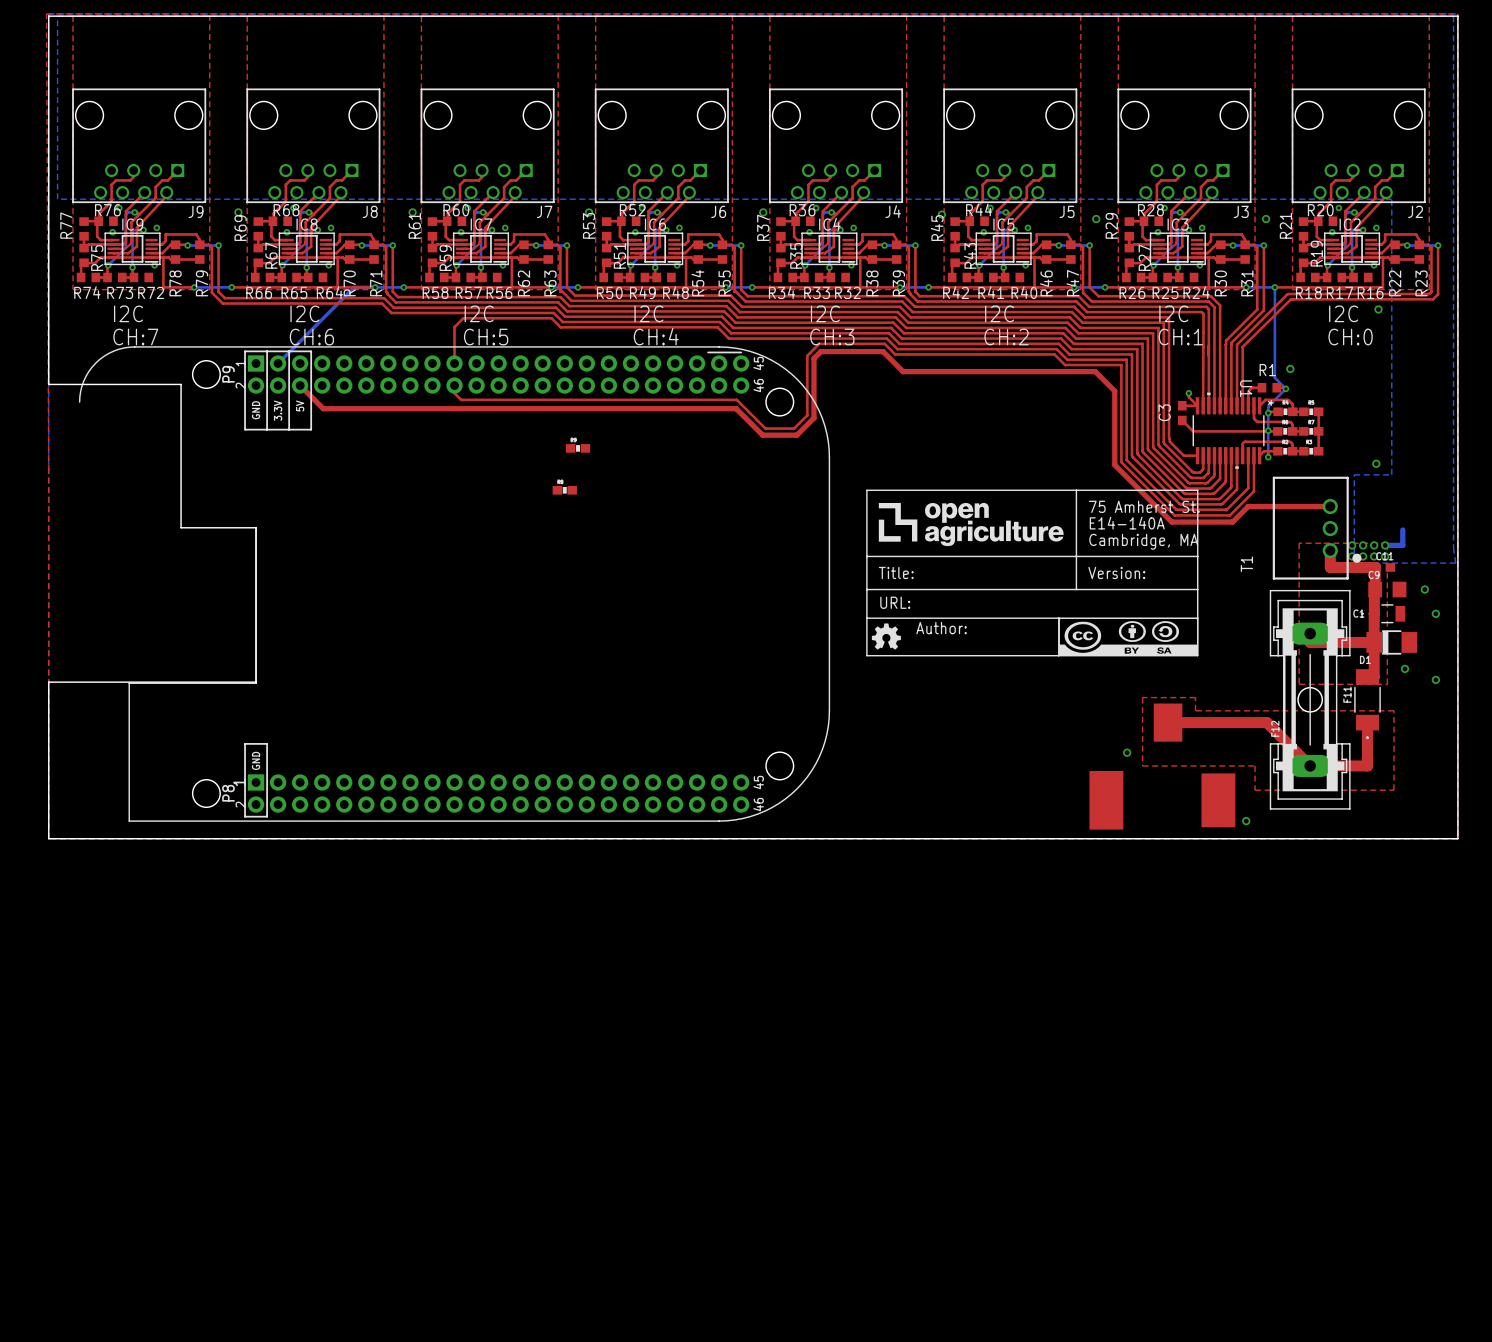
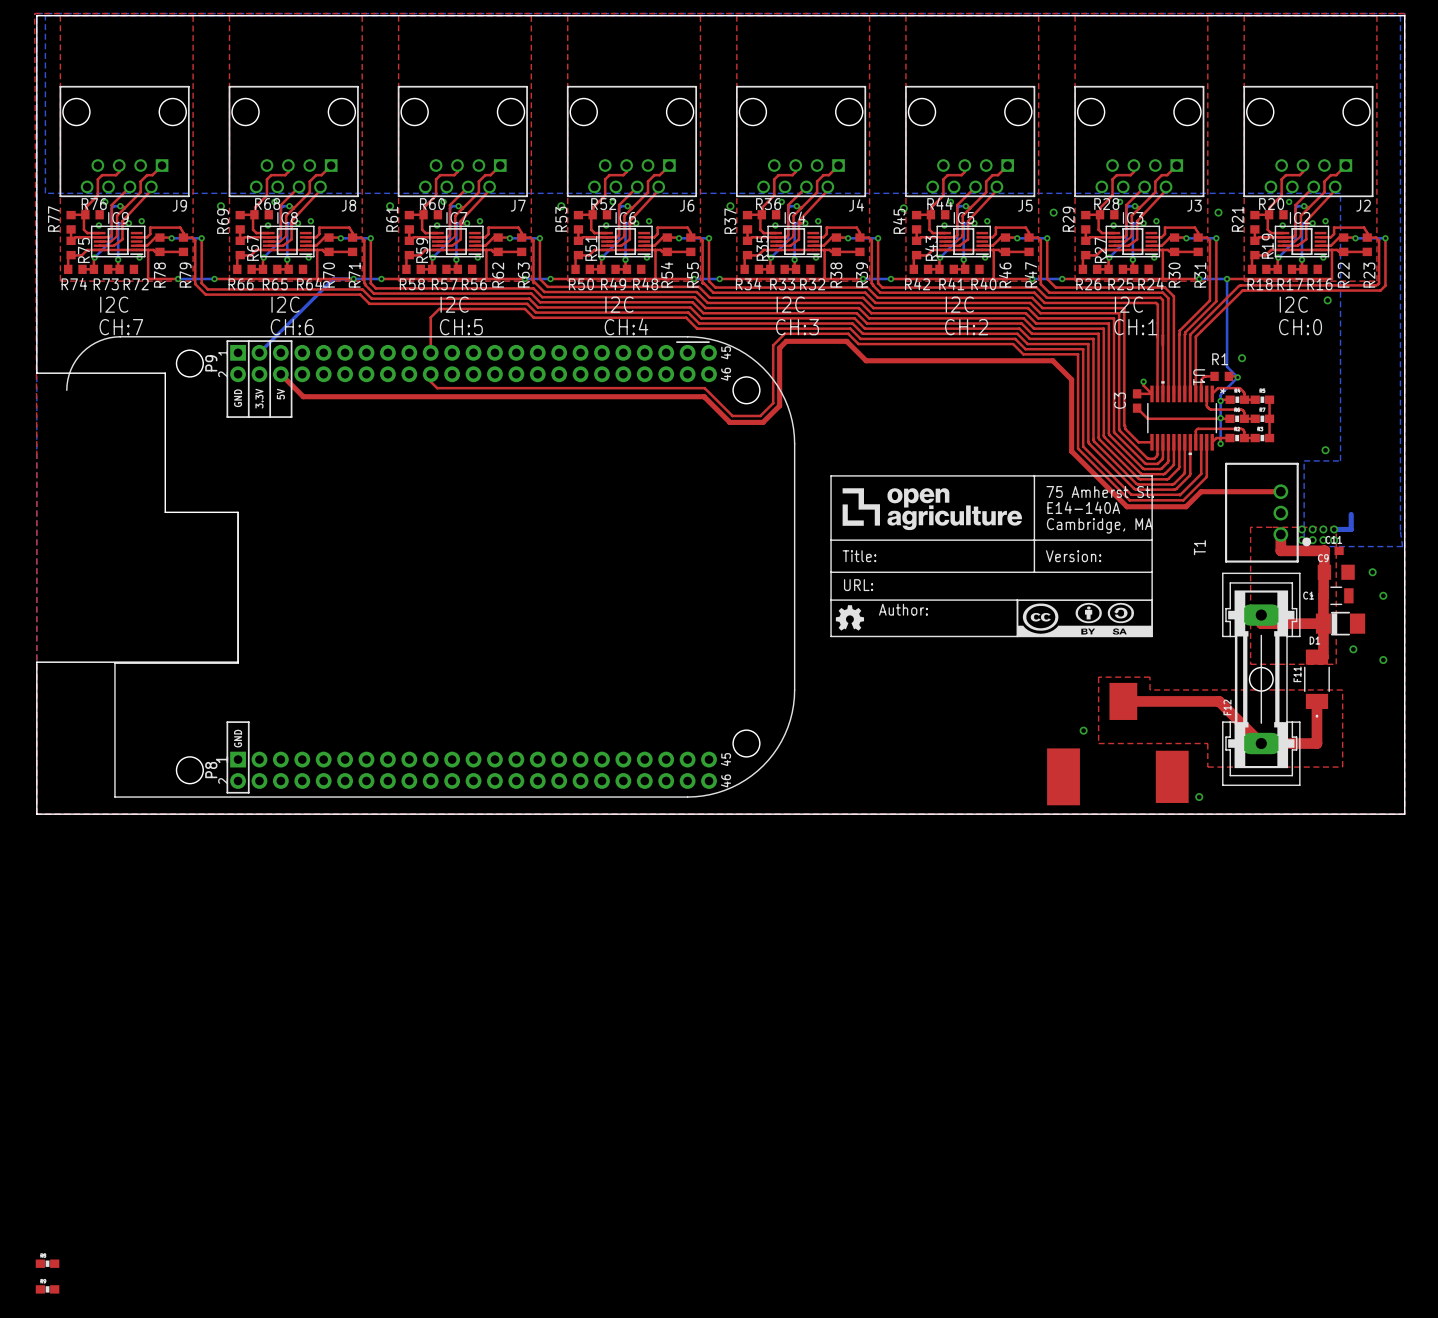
part position: (578, 448) -> (47, 1289)
part position: (564, 490) -> (47, 1263)

